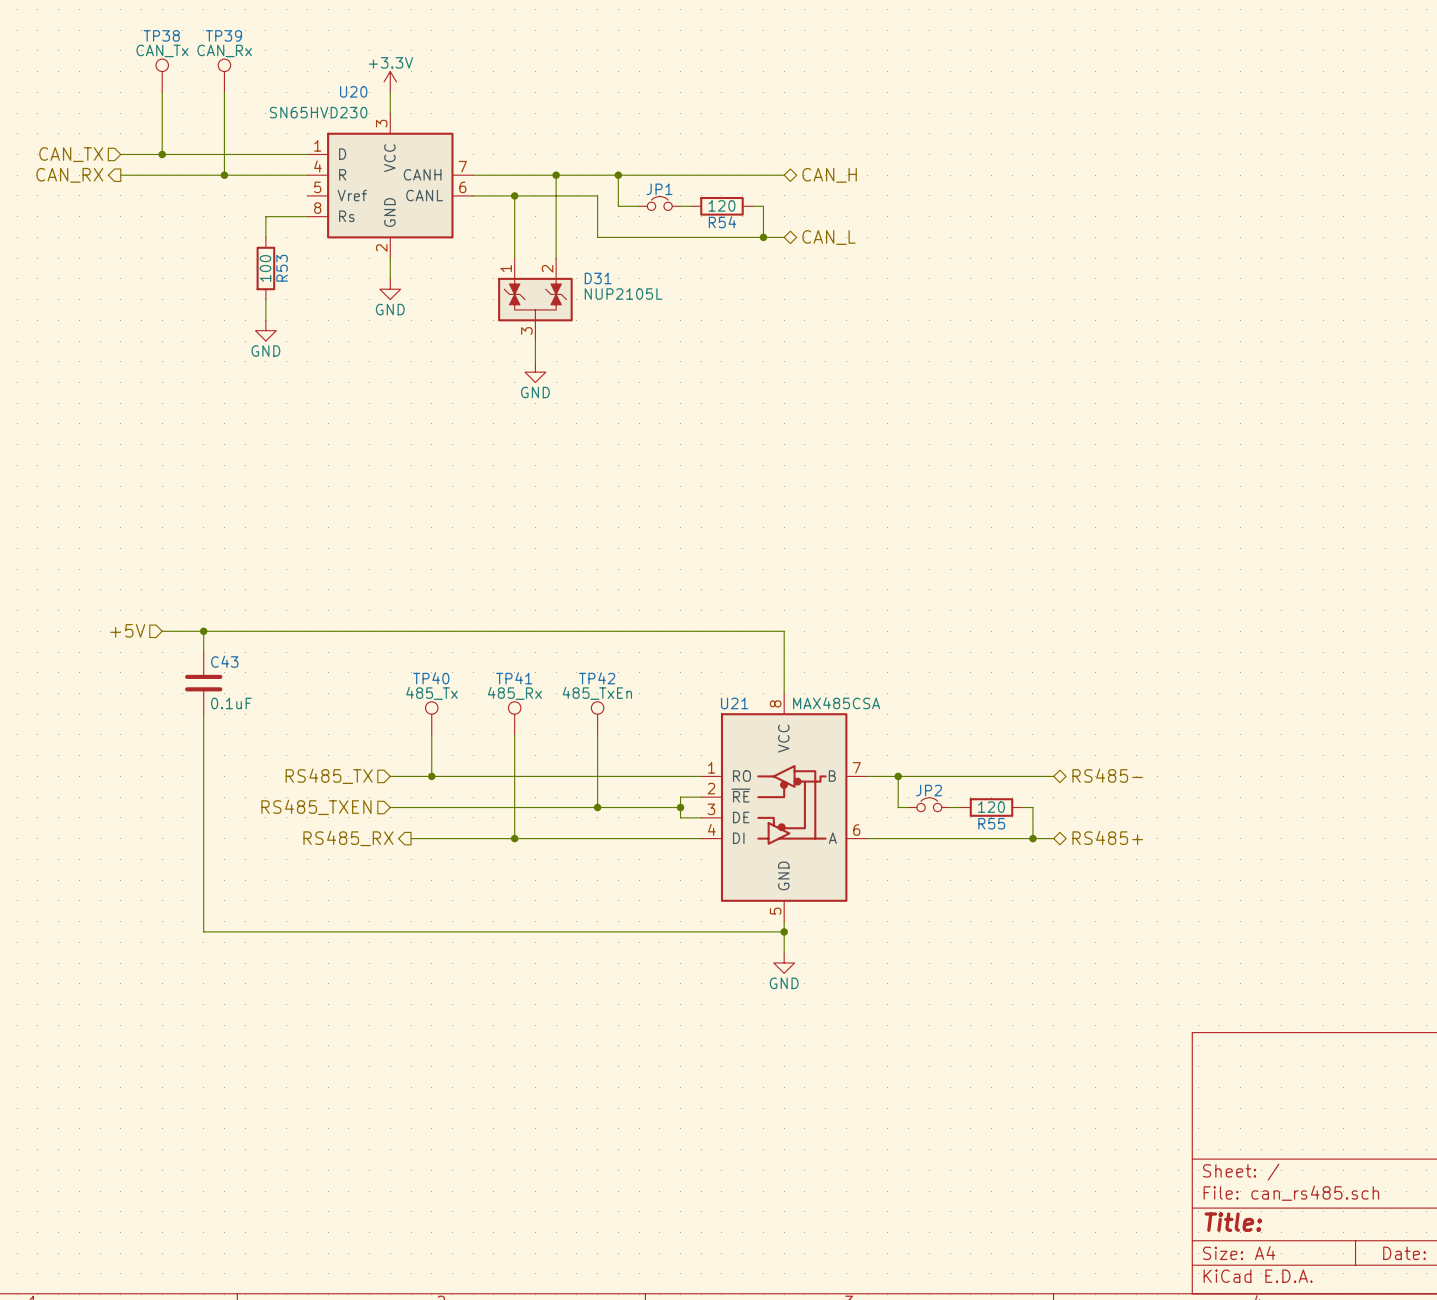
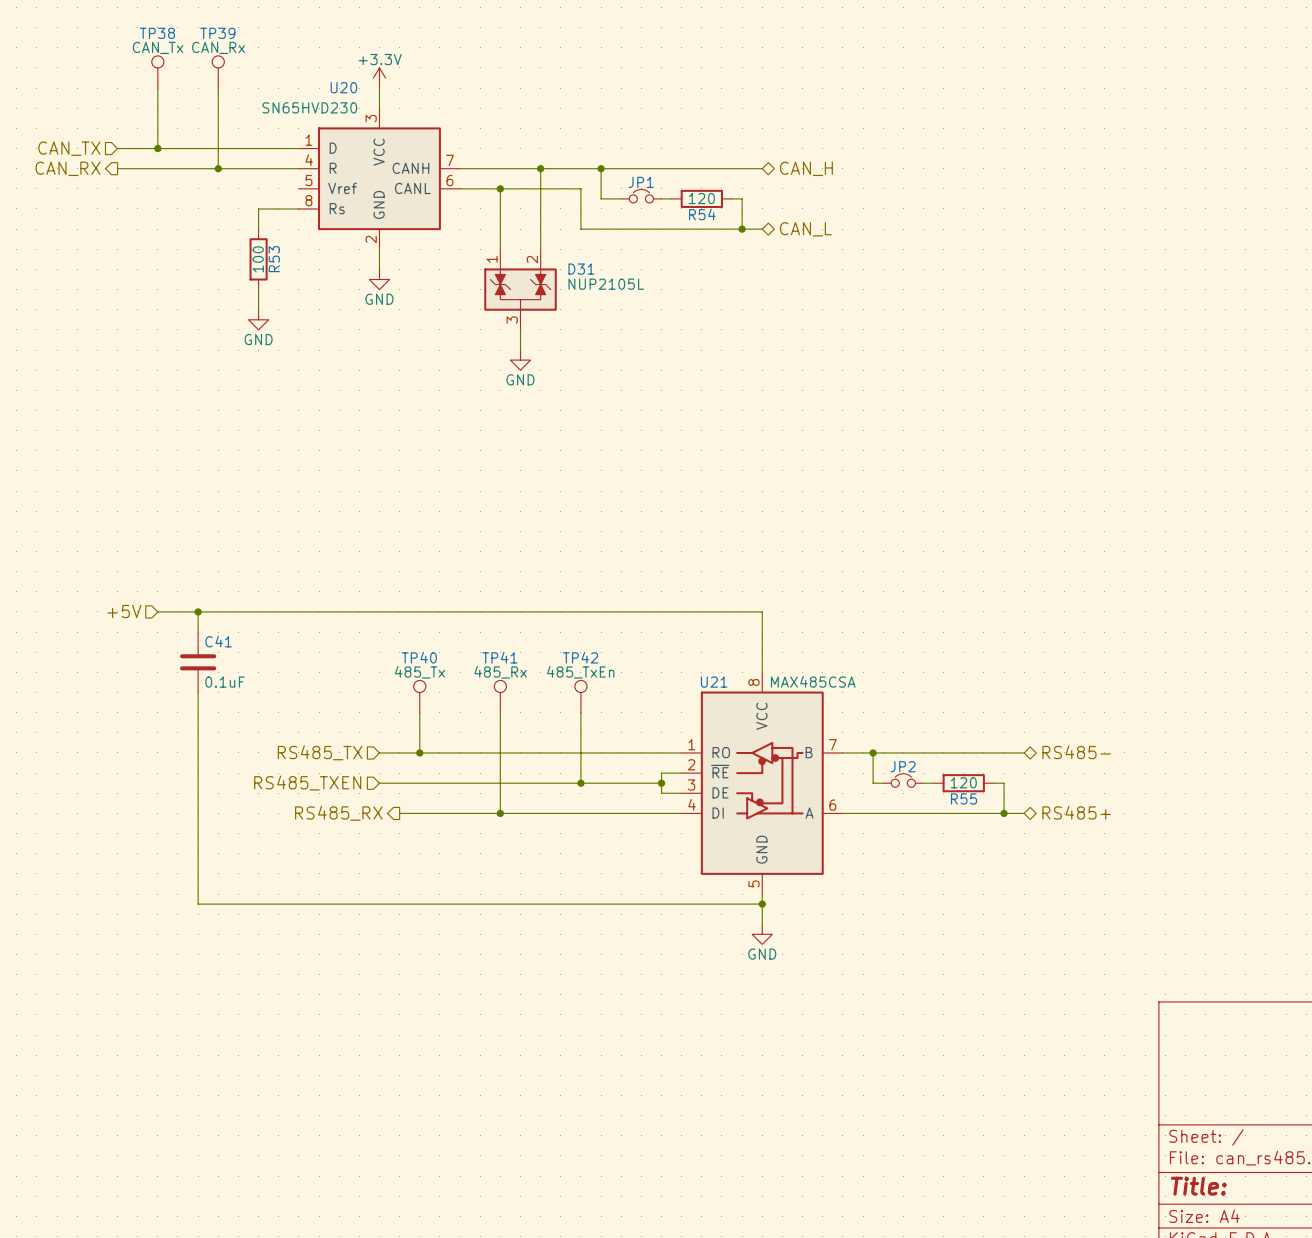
C43 name: C43 (224, 661) -> C41 (218, 641)

